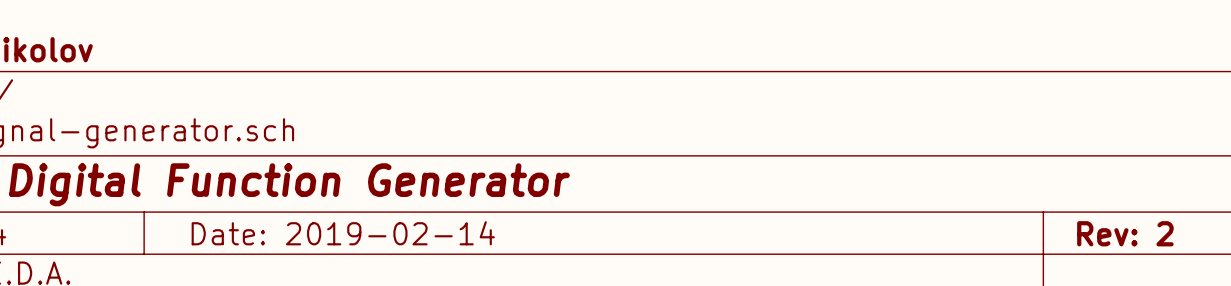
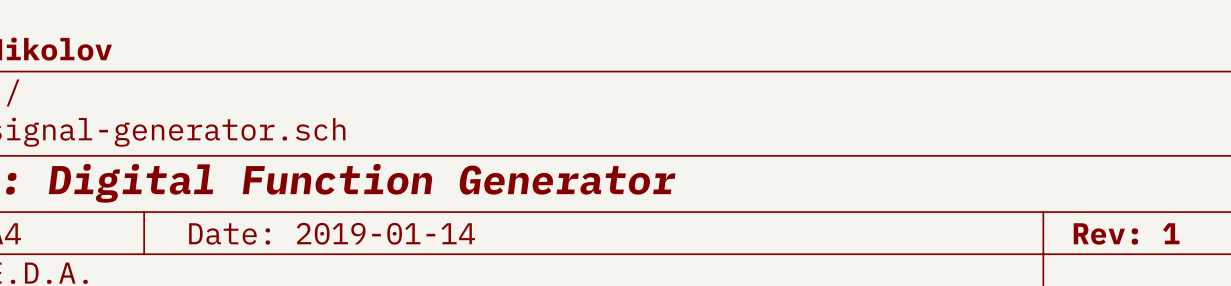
title block: Date: 2019-02-14 (343, 233) -> Date: 2019-01-14 (332, 233)
title block: Rev: 2 (1125, 233) -> Rev: 1 (1126, 233)

